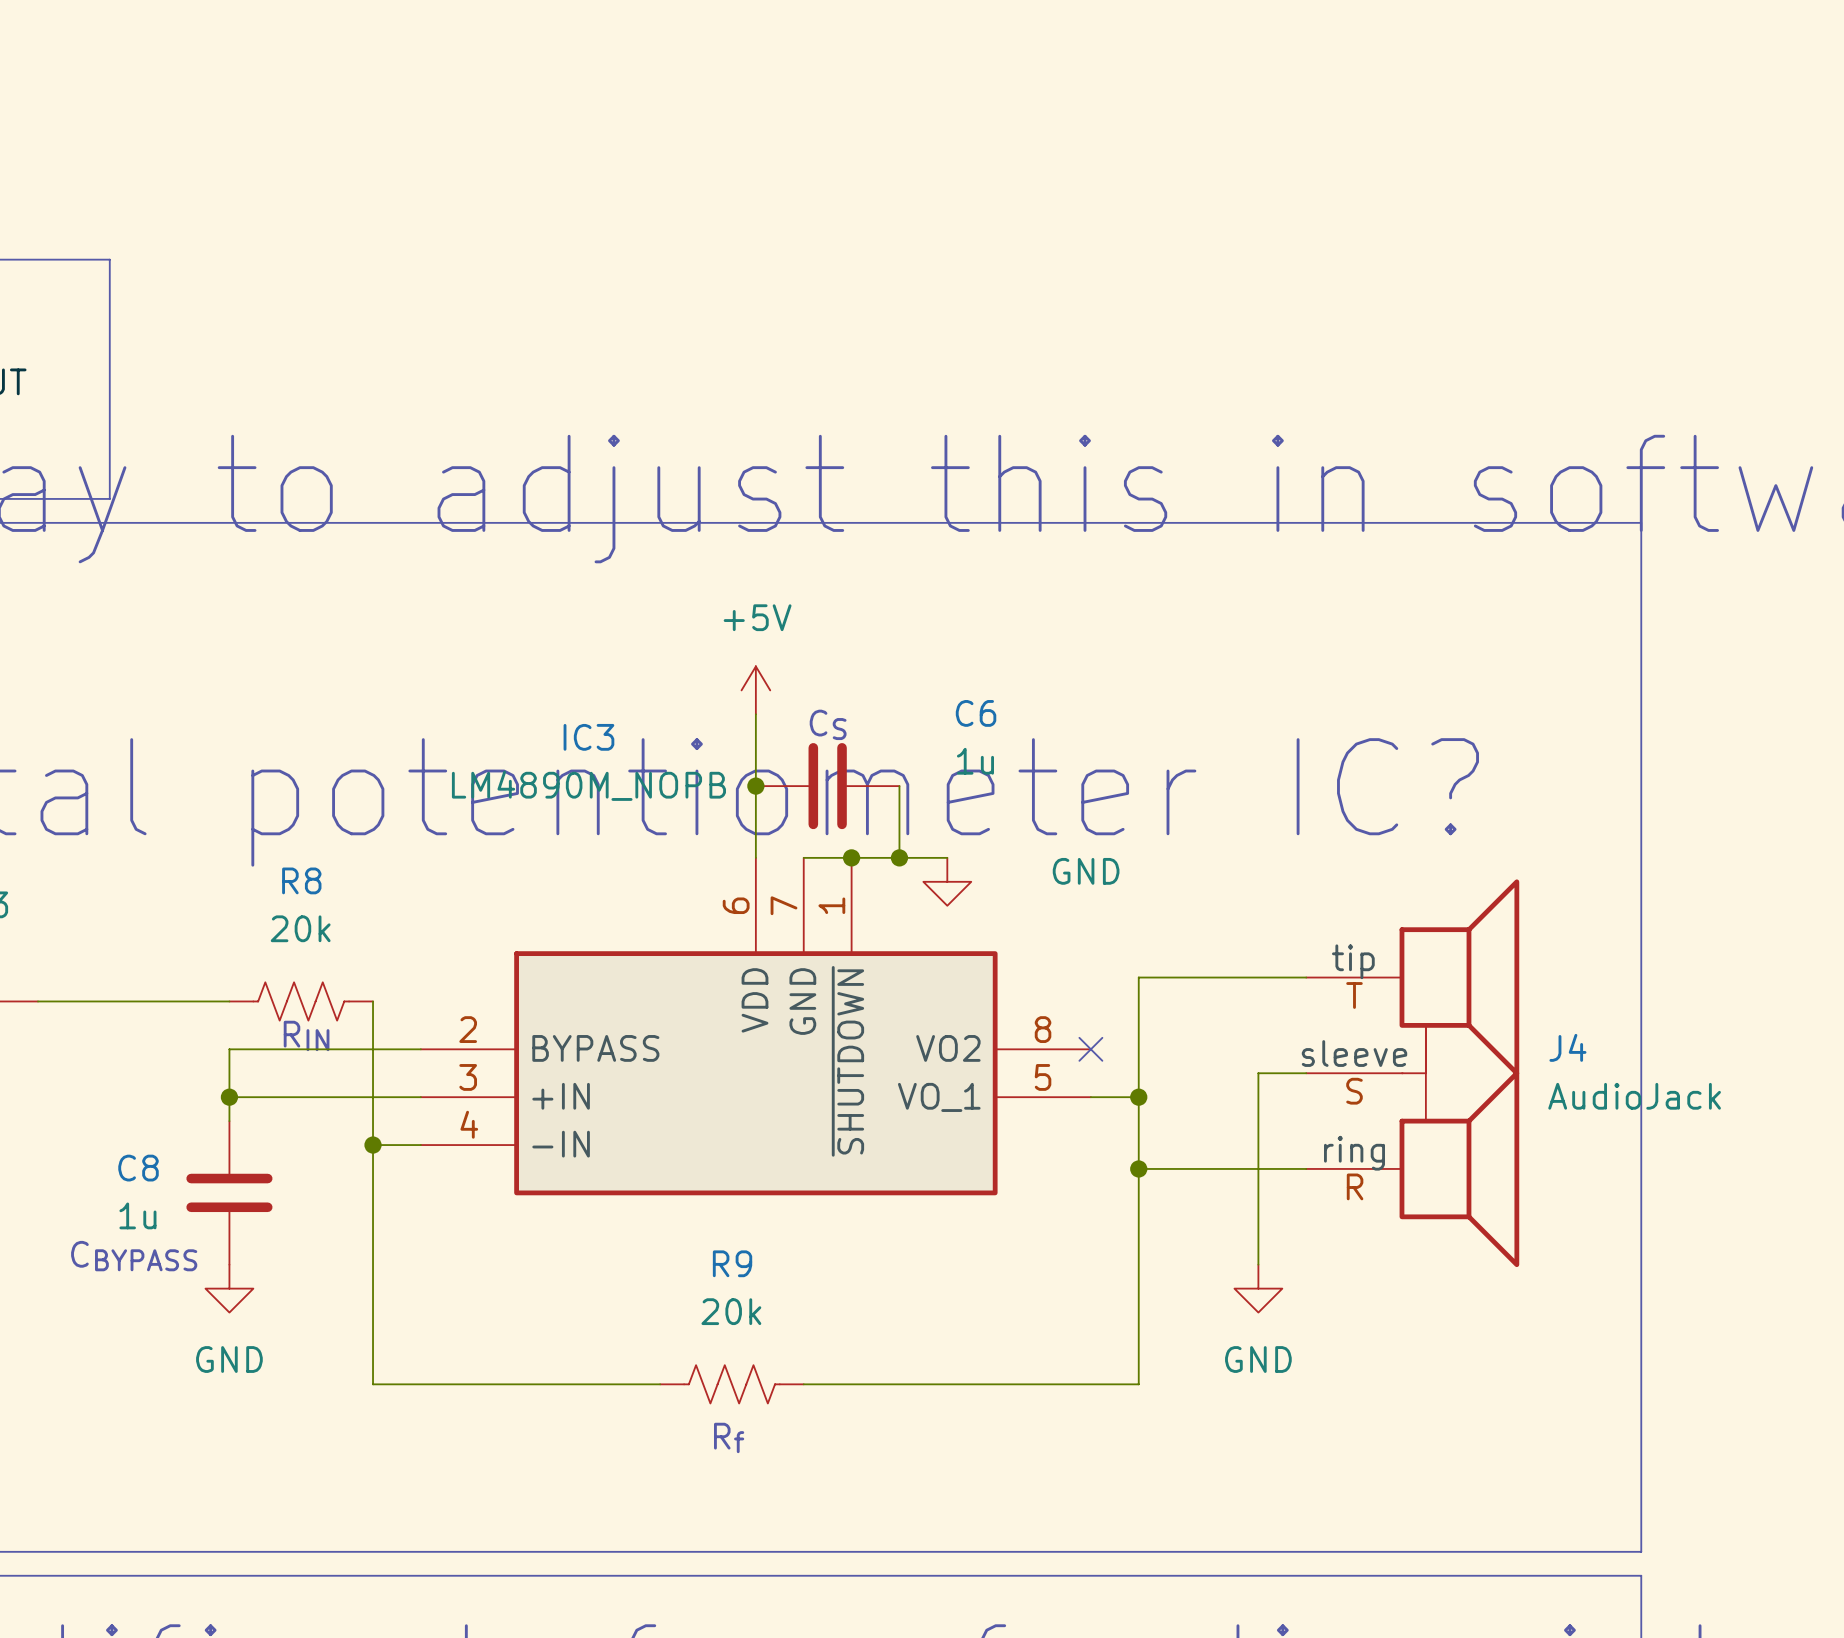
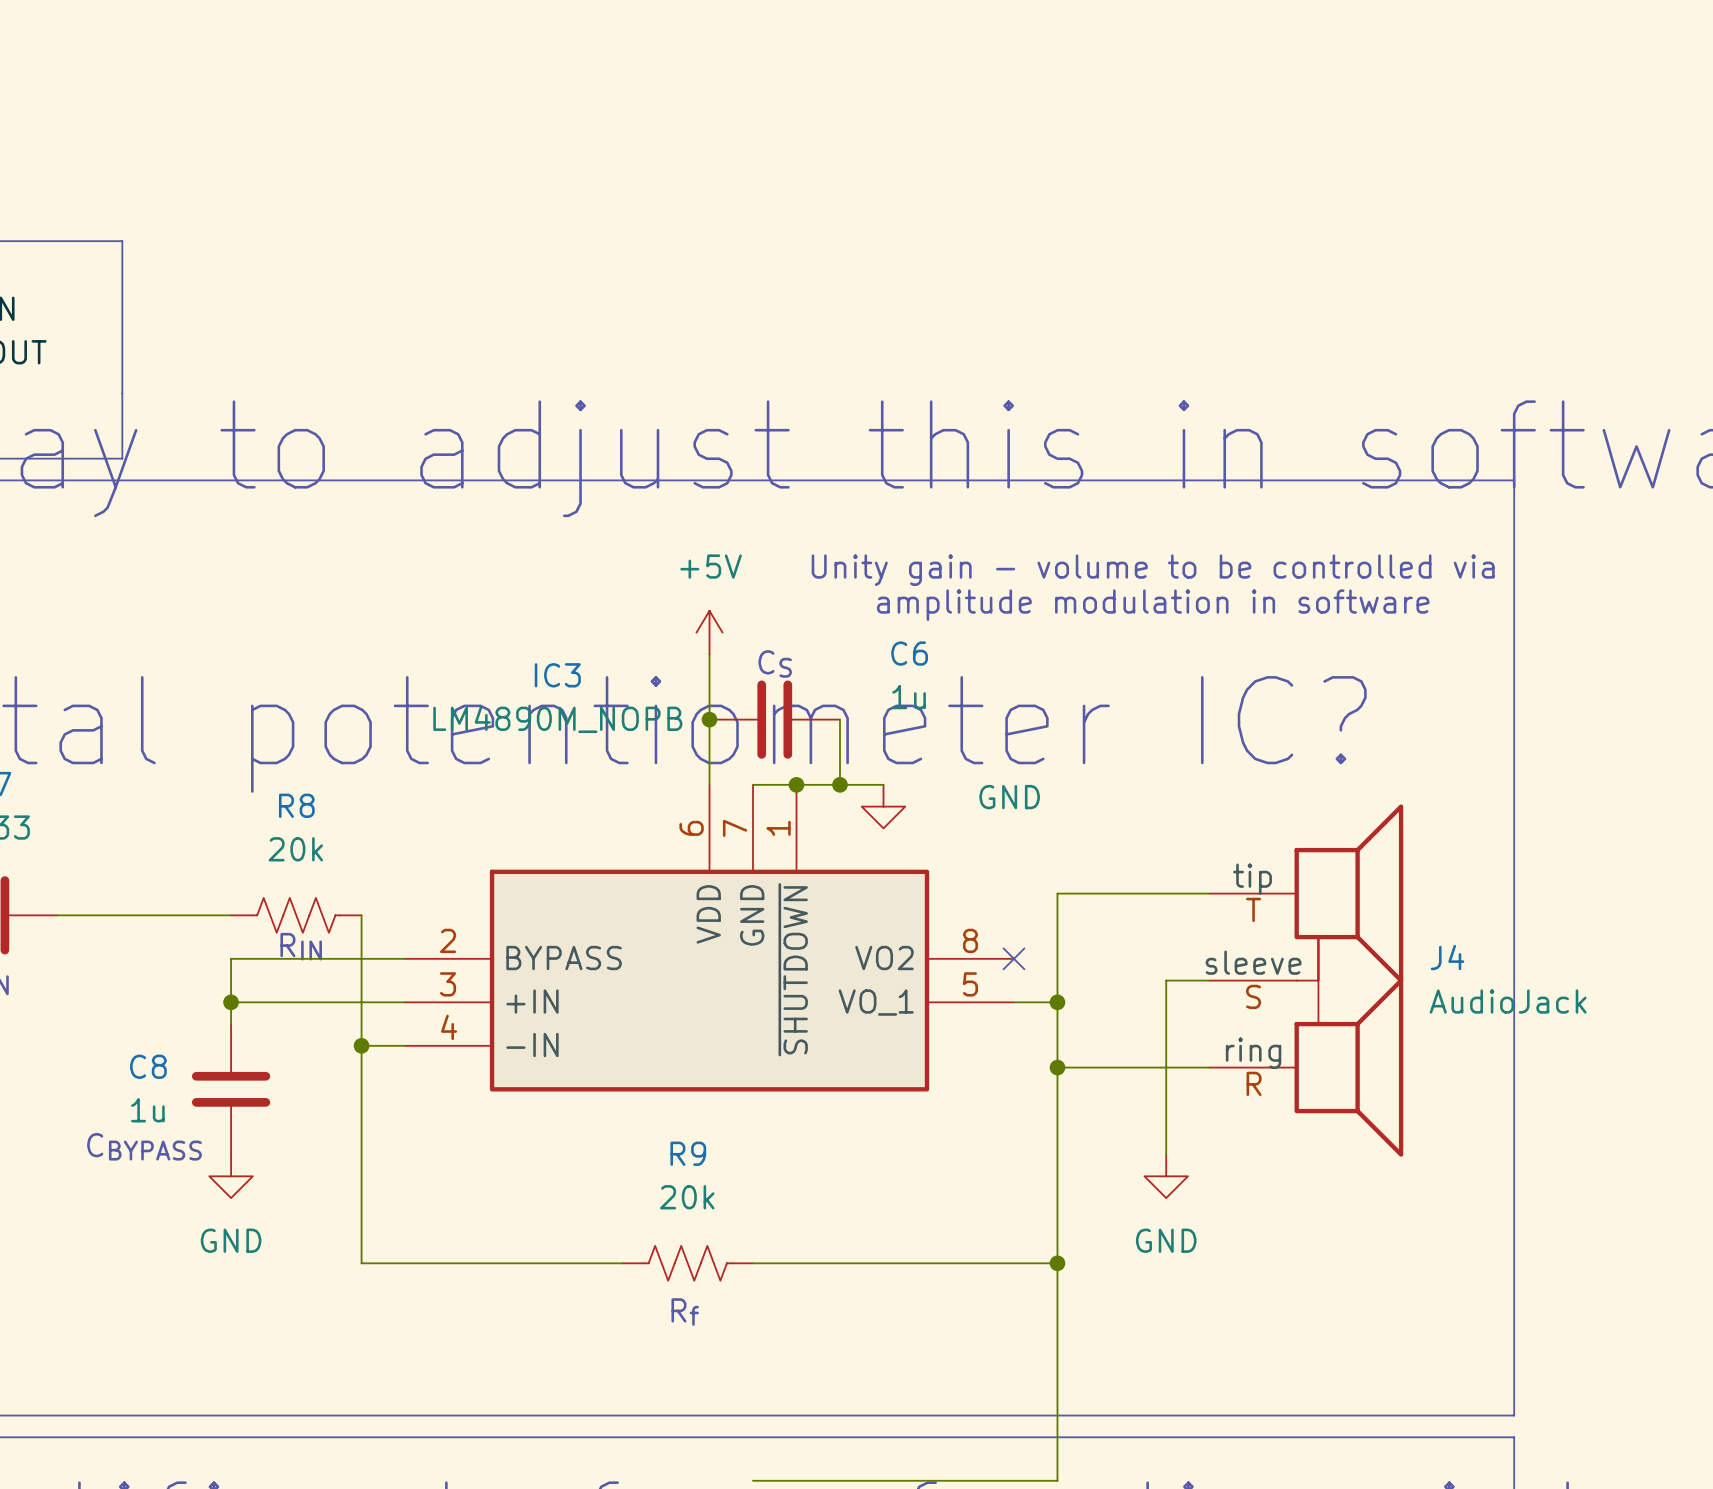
text: none -> Unity gain - volume to be controlled via (1153, 570)
text: none -> amplitude modulation in software (1153, 605)
wire: none -> (1057, 1263) (1057, 1480) (753, 1480)
junction: none -> (1057, 1263)

